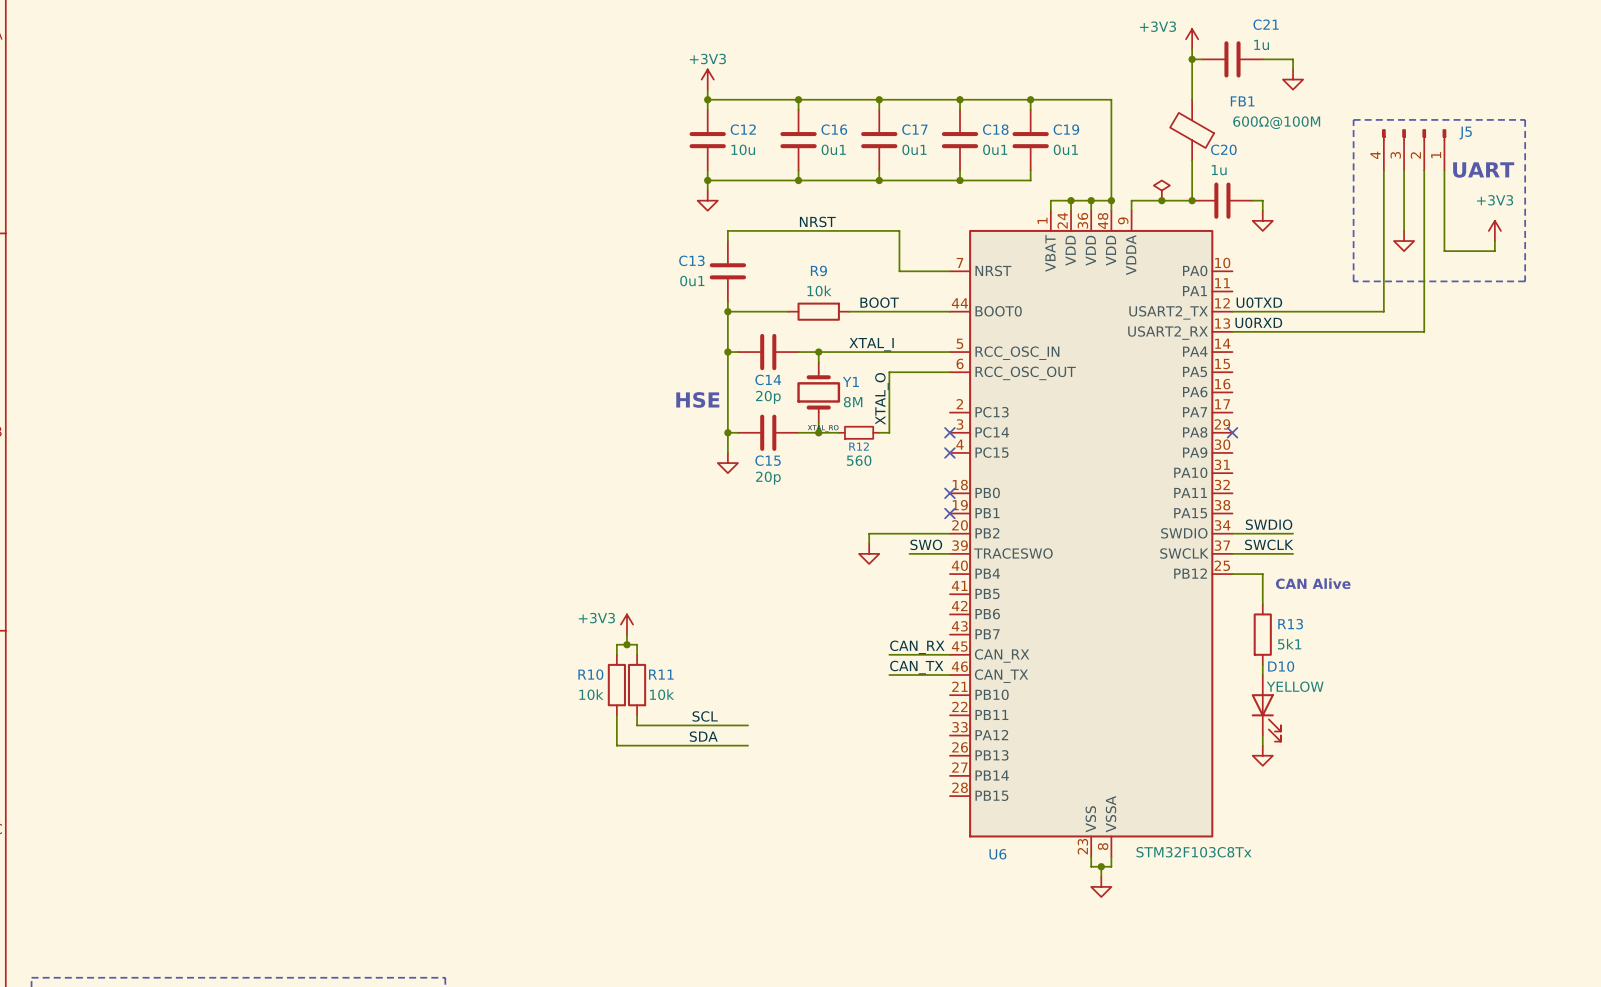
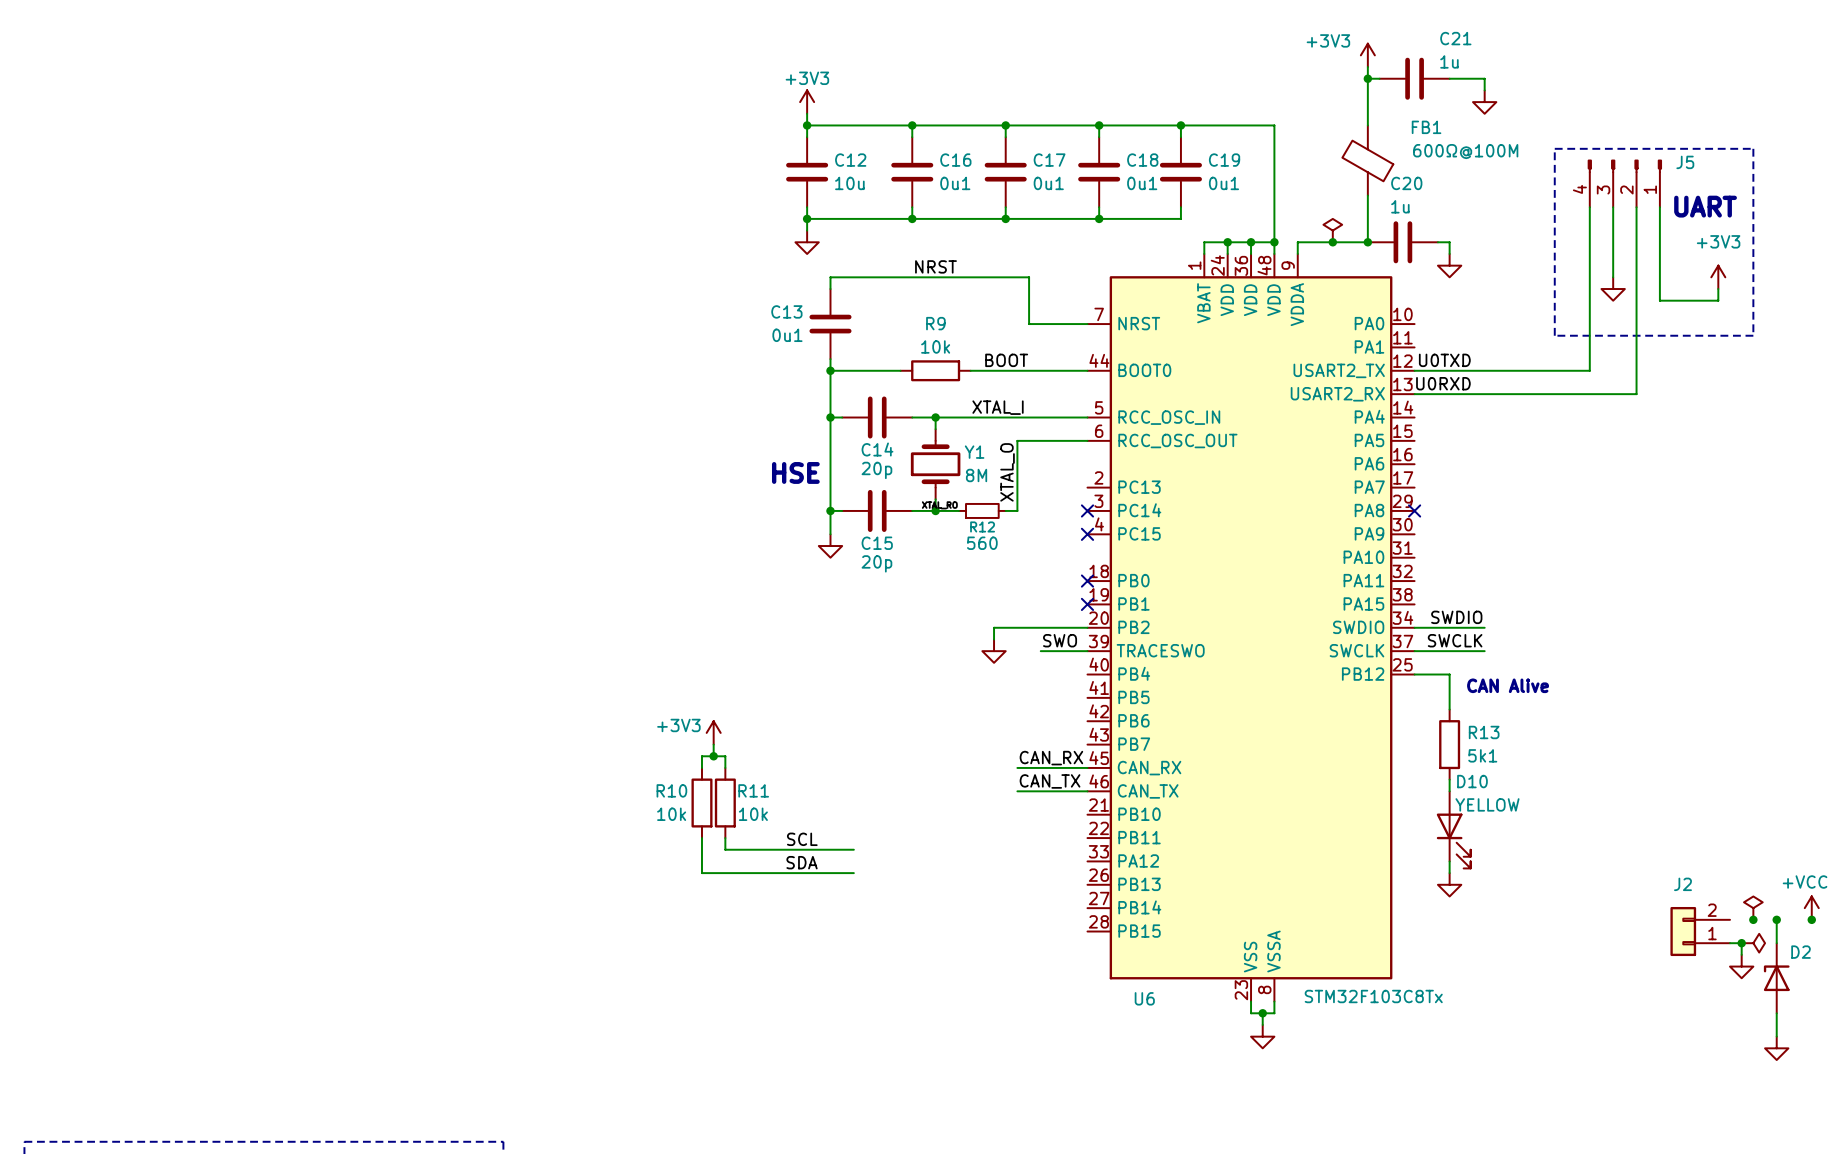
power symbol: none -> (1753, 908)
power symbol: none -> +VCC (1811, 908)
junction: none -> (1753, 919)
wire: none -> (1776, 919) (1776, 943)
junction: none -> (1776, 919)
junction: none -> (1811, 919)
J2: none -> (1700, 931)
wire: none -> (1729, 943) (1741, 943) (1741, 954)
junction: none -> (1741, 943)
power symbol: none -> (1753, 943)
power symbol: none -> (1741, 966)
D2: none -> (1776, 978)
wire: none -> (1776, 1013) (1776, 1036)
power symbol: none -> (1776, 1048)

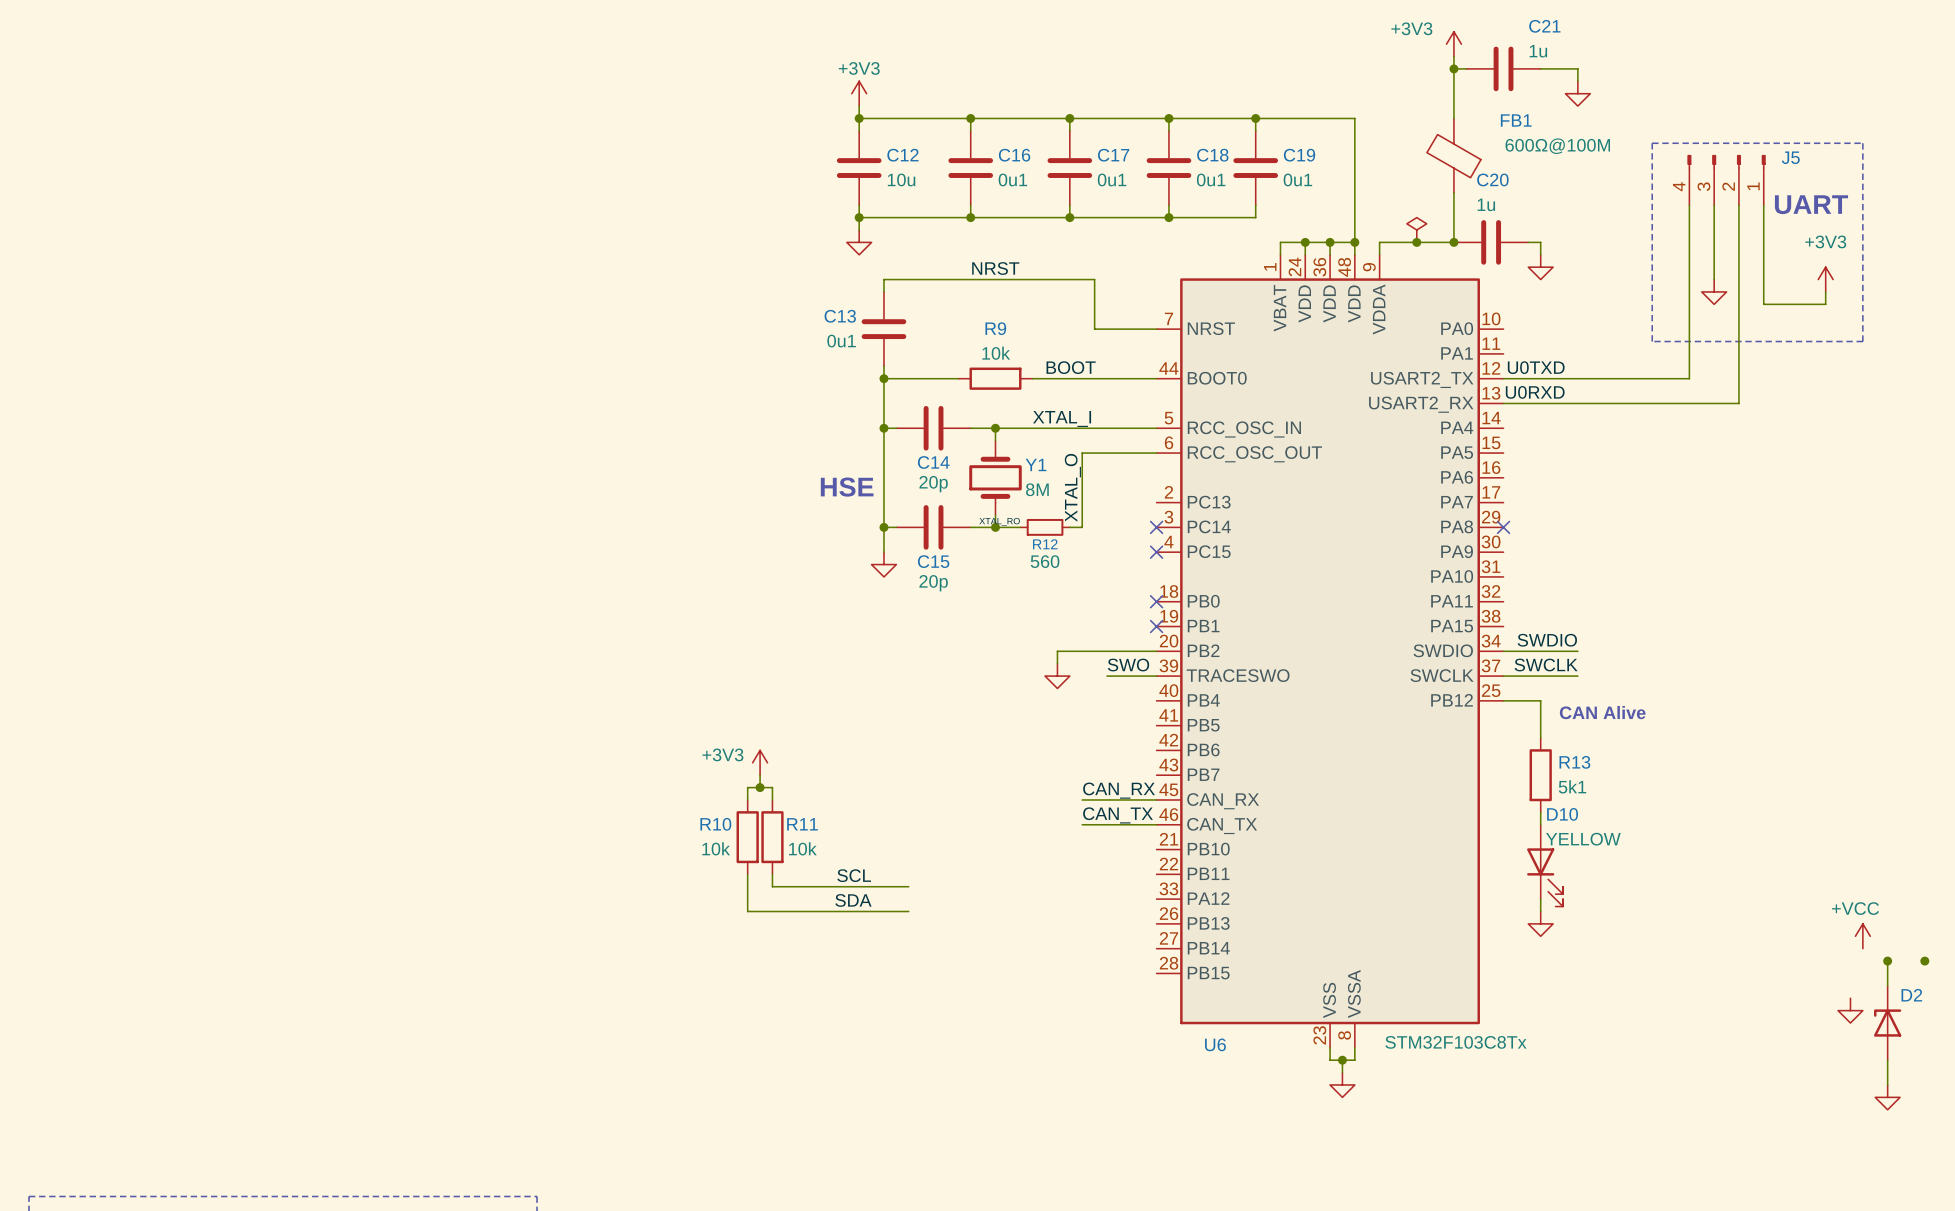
power symbol: (1753, 908) -> none
power symbol position: +VCC (1811, 908) -> +VCC (1862, 936)
junction: (1753, 919) -> none
J2: (1700, 931) -> none
wire: (1729, 943) (1741, 943) (1741, 954) -> none
junction: (1741, 943) -> none
power symbol: (1753, 943) -> none

